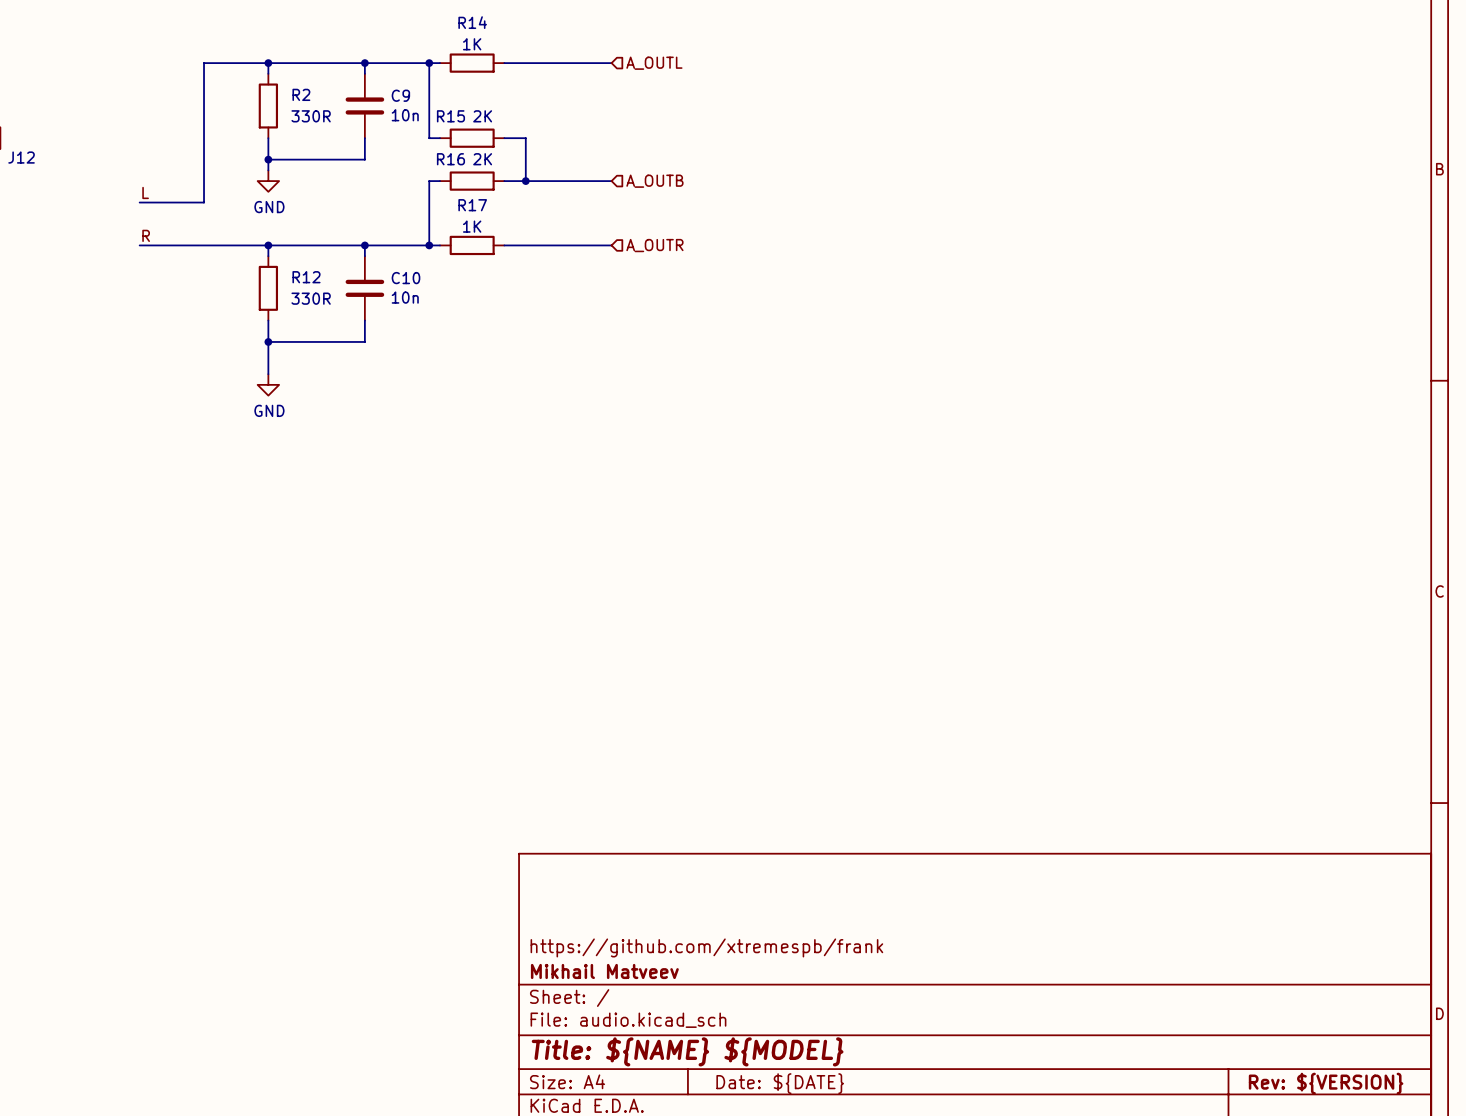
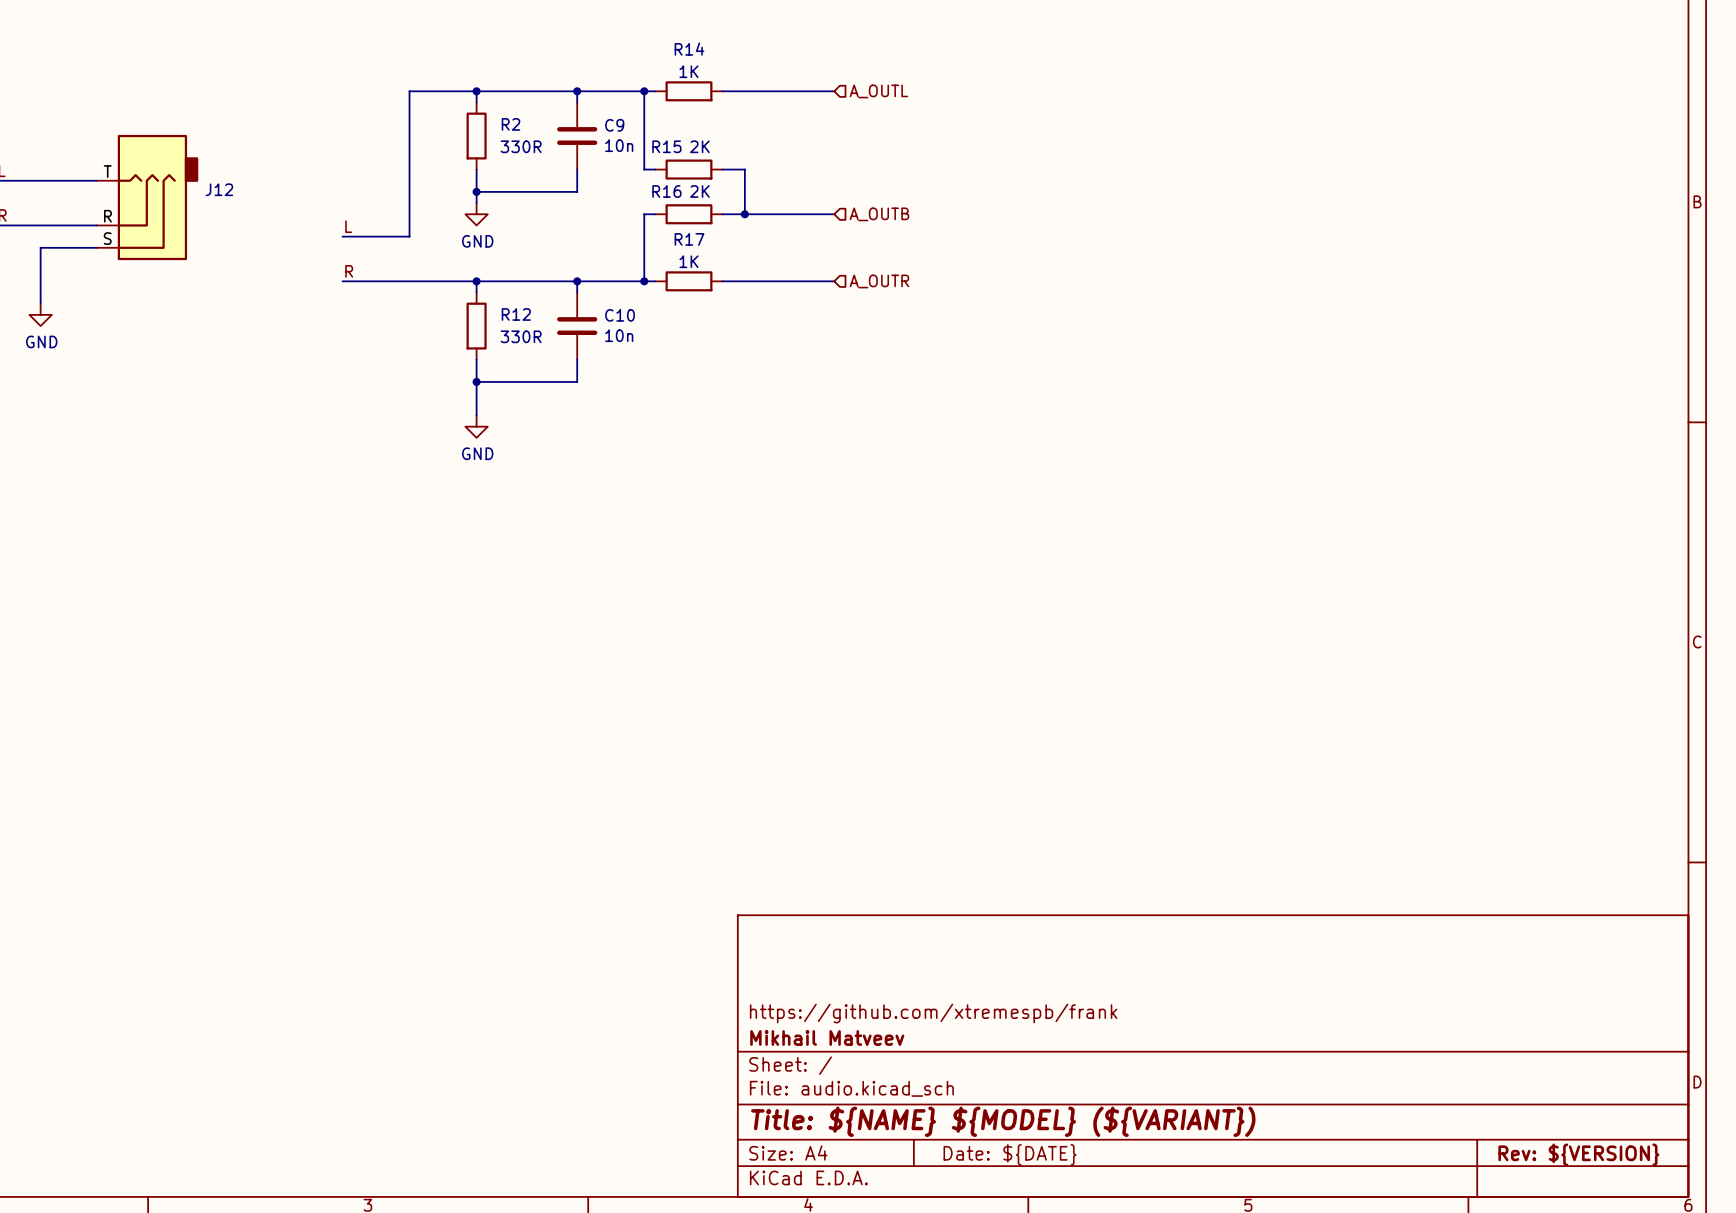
title block: Title: ${NAME} ${MODEL} (687, 1051) -> Title: ${NAME} ${MODEL} (${VARIANT}) (1003, 1121)

